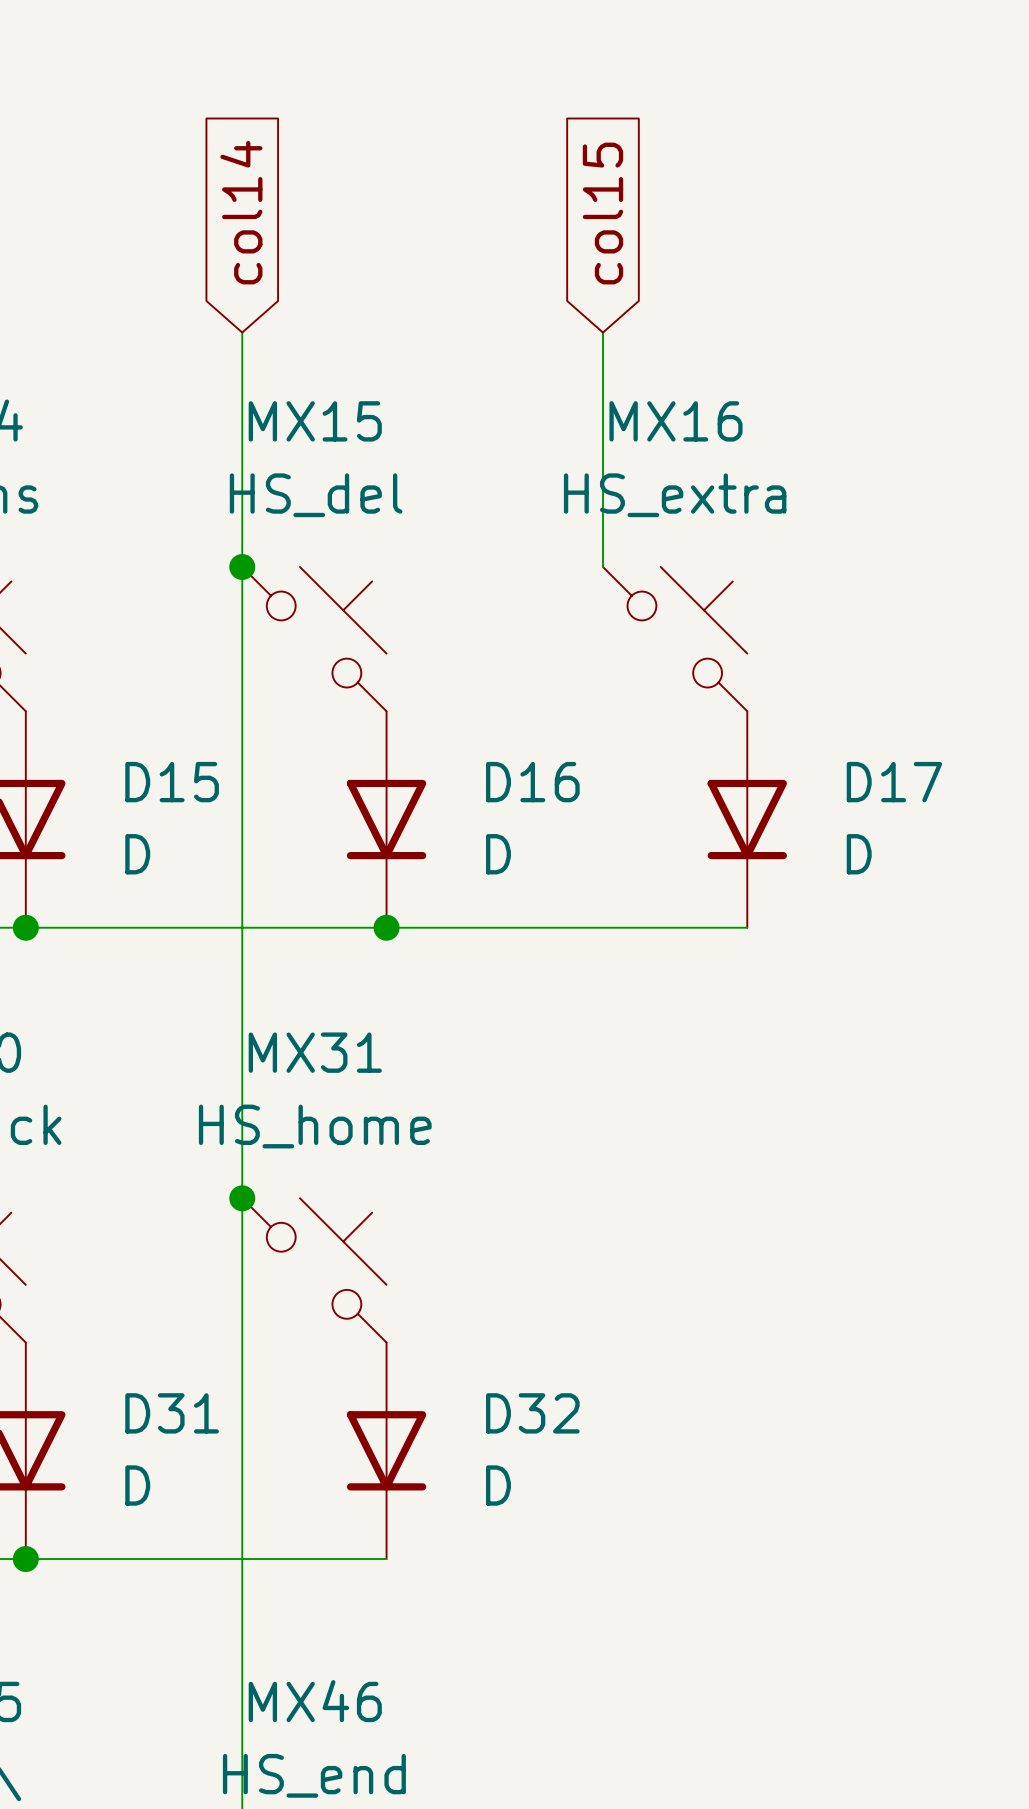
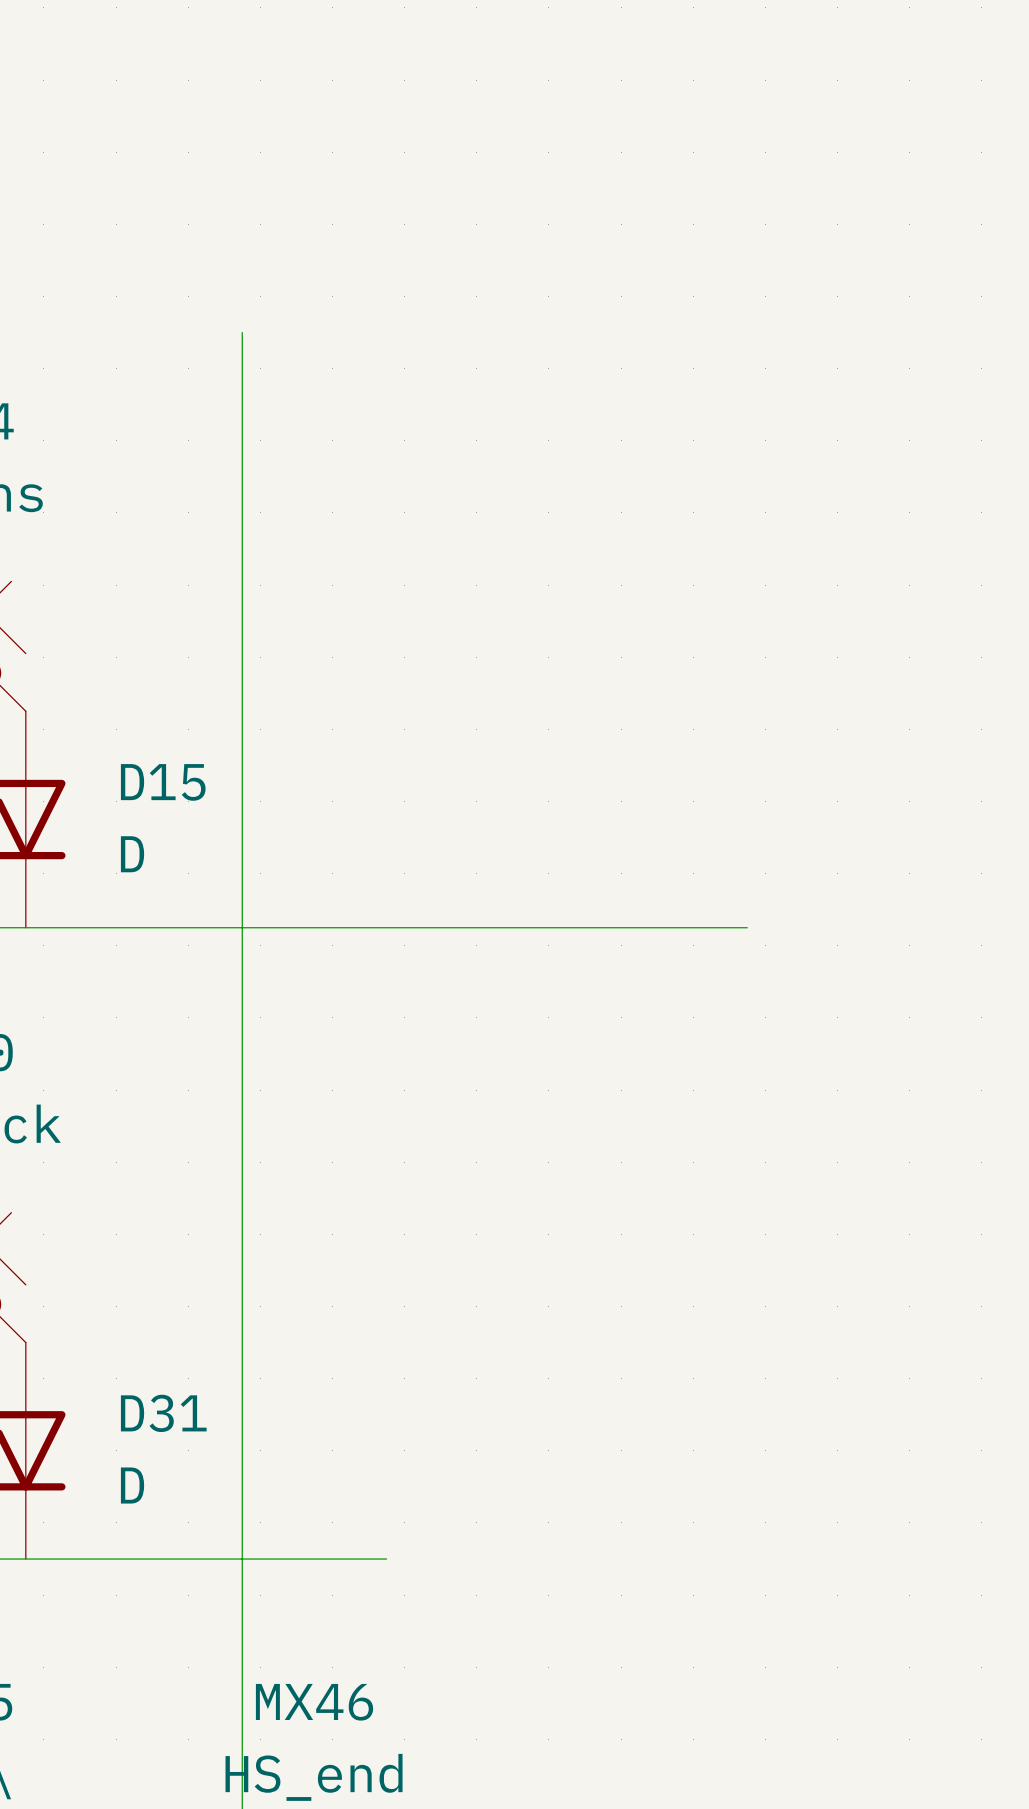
global label: col14 (241, 212) -> none
global label: col15 (602, 213) -> none
wire: (602, 332) (602, 567) -> none
junction: (242, 567) -> none
MX15: HS_del (314, 639) -> none
MX16: HS_extra (675, 639) -> none
D16: D (386, 819) -> none
D17: D (747, 819) -> none
junction: (25, 927) -> none
junction: (386, 927) -> none
junction: (242, 1198) -> none
MX31: HS_home (314, 1270) -> none
D32: D (386, 1450) -> none
junction: (25, 1559) -> none

